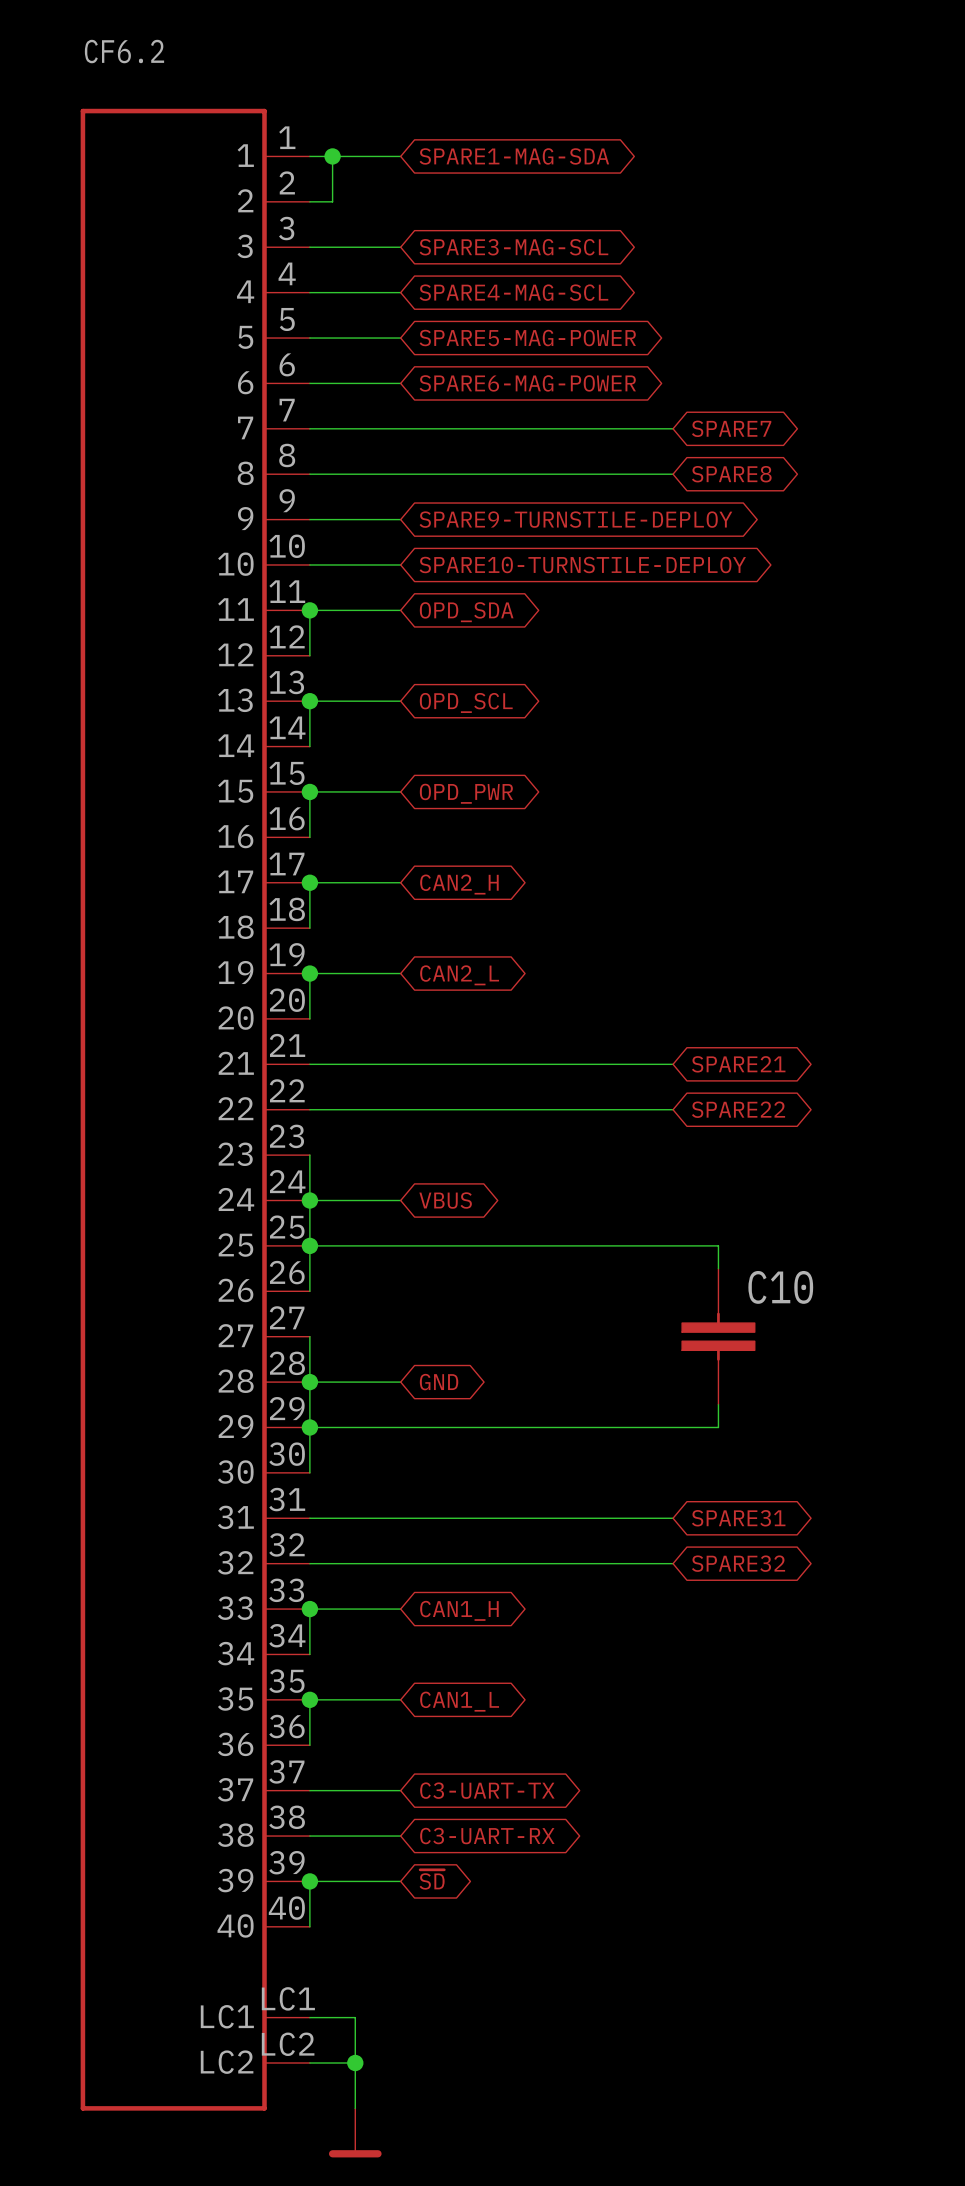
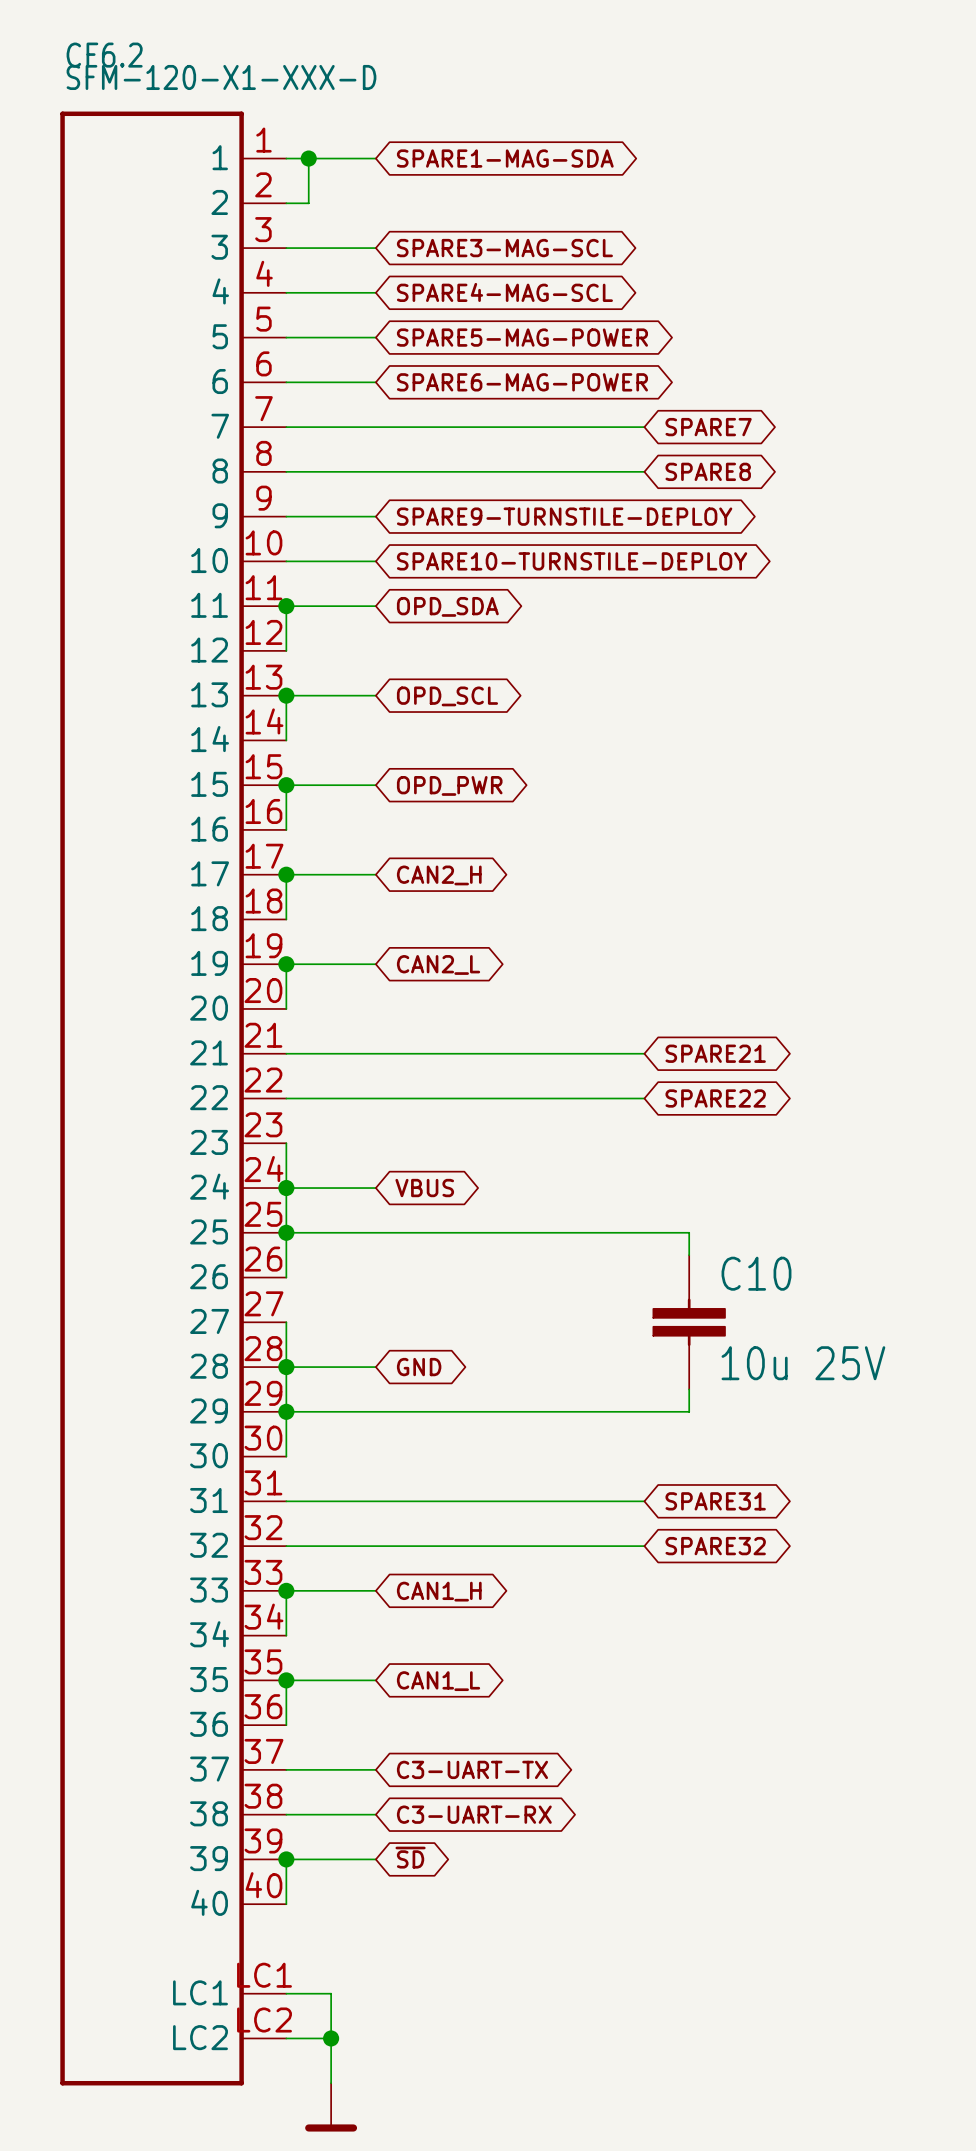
CF6.2 value: none -> SFM-120-X1-XXX-D (221, 77)
C10 value: none -> 10u 25V (803, 1363)

